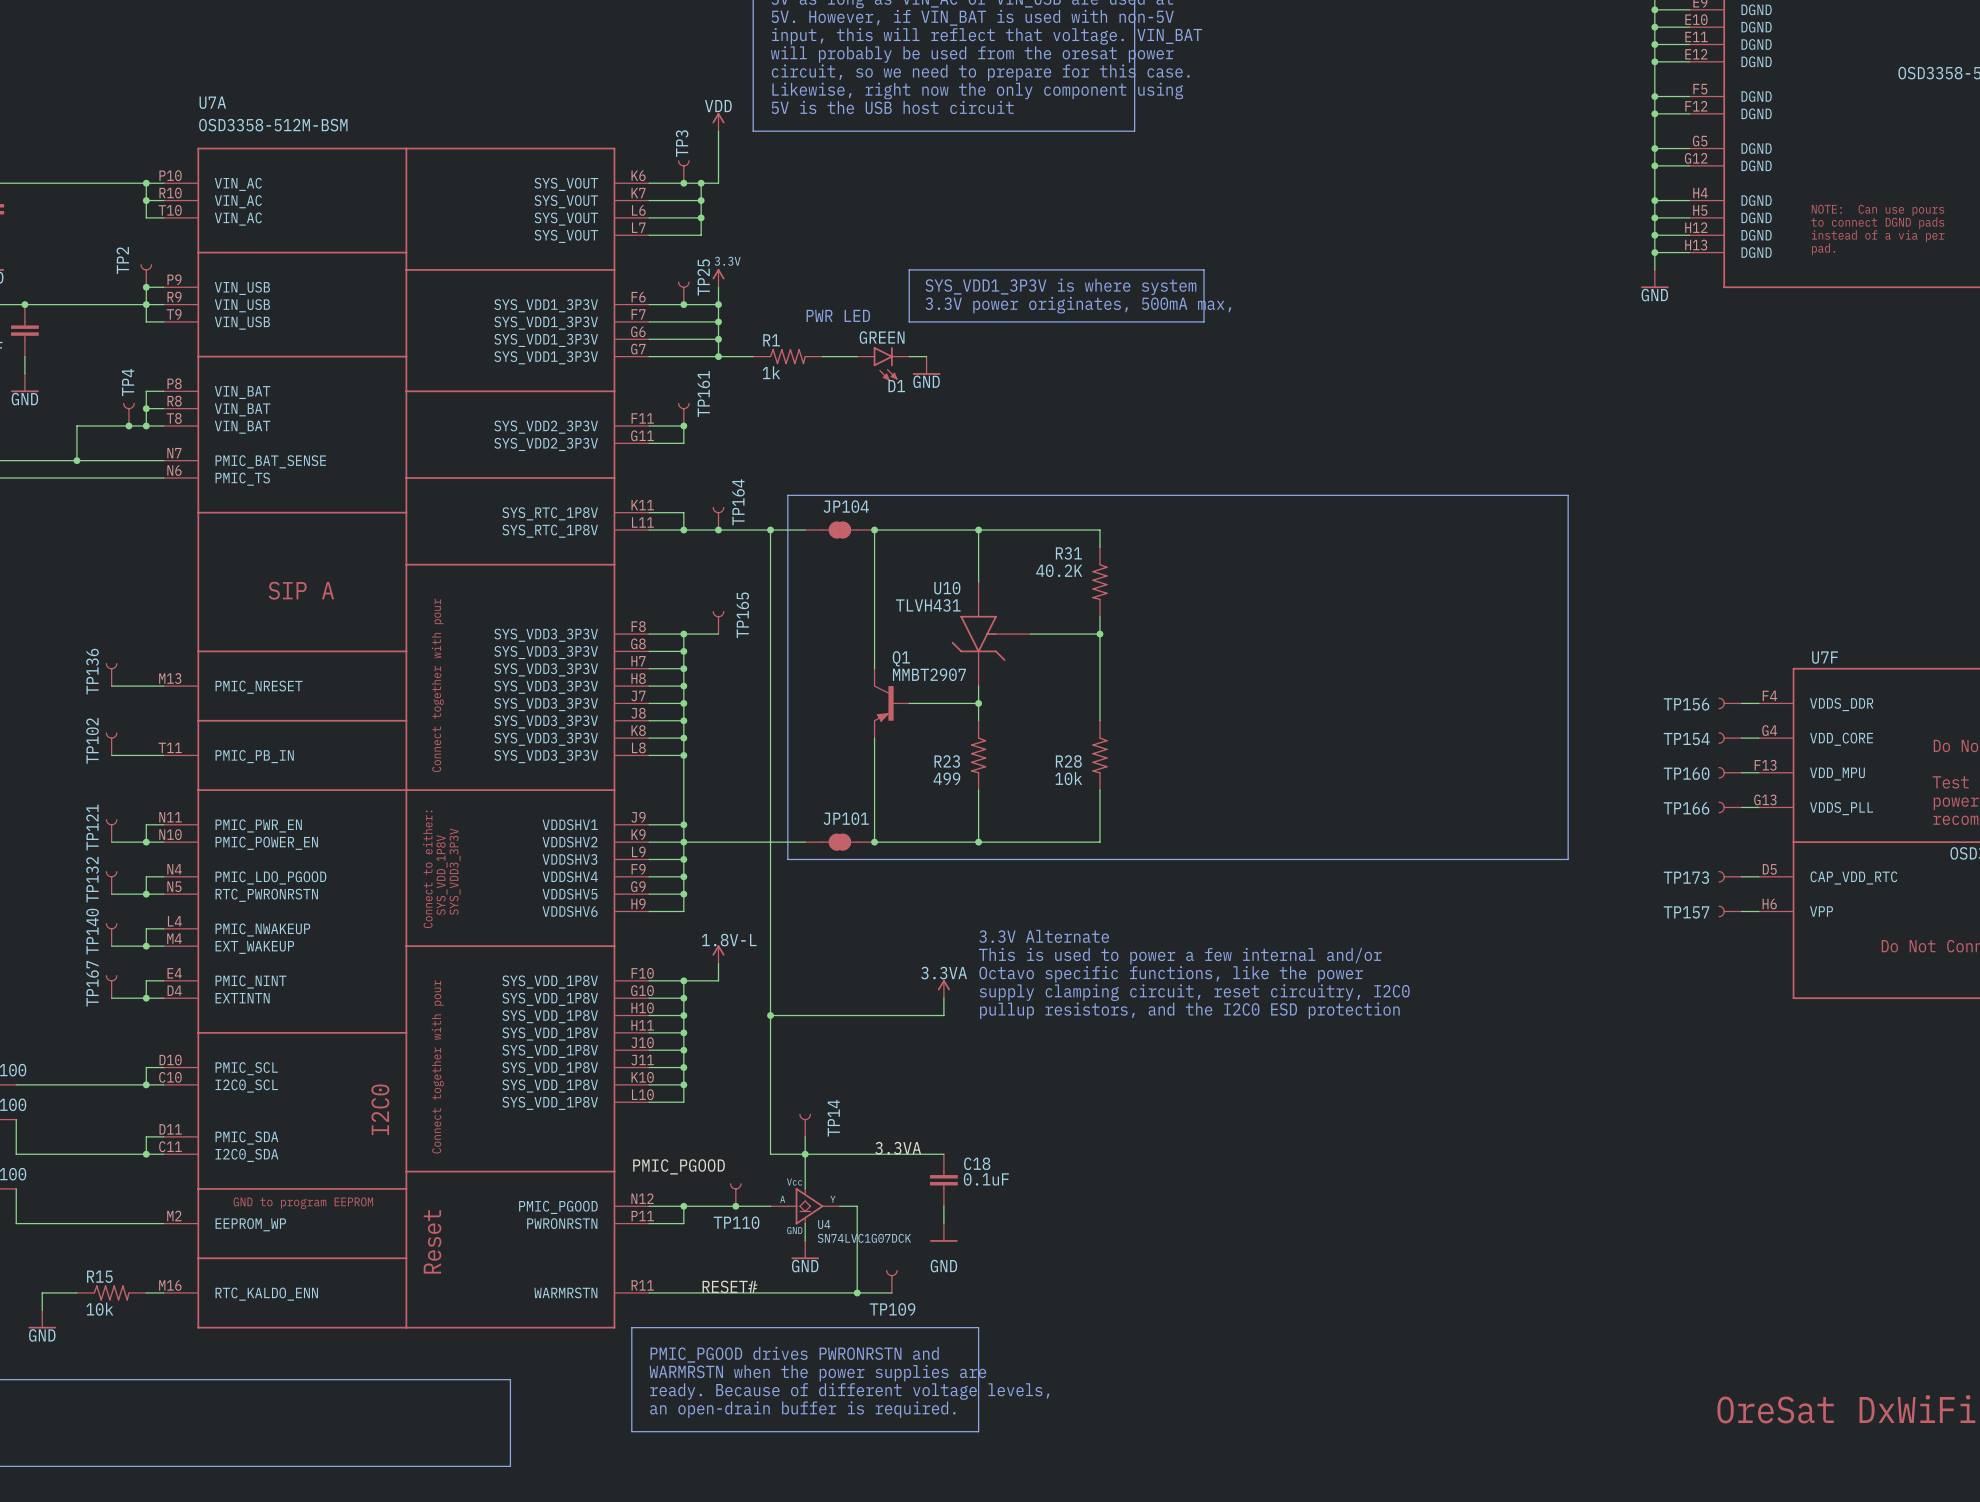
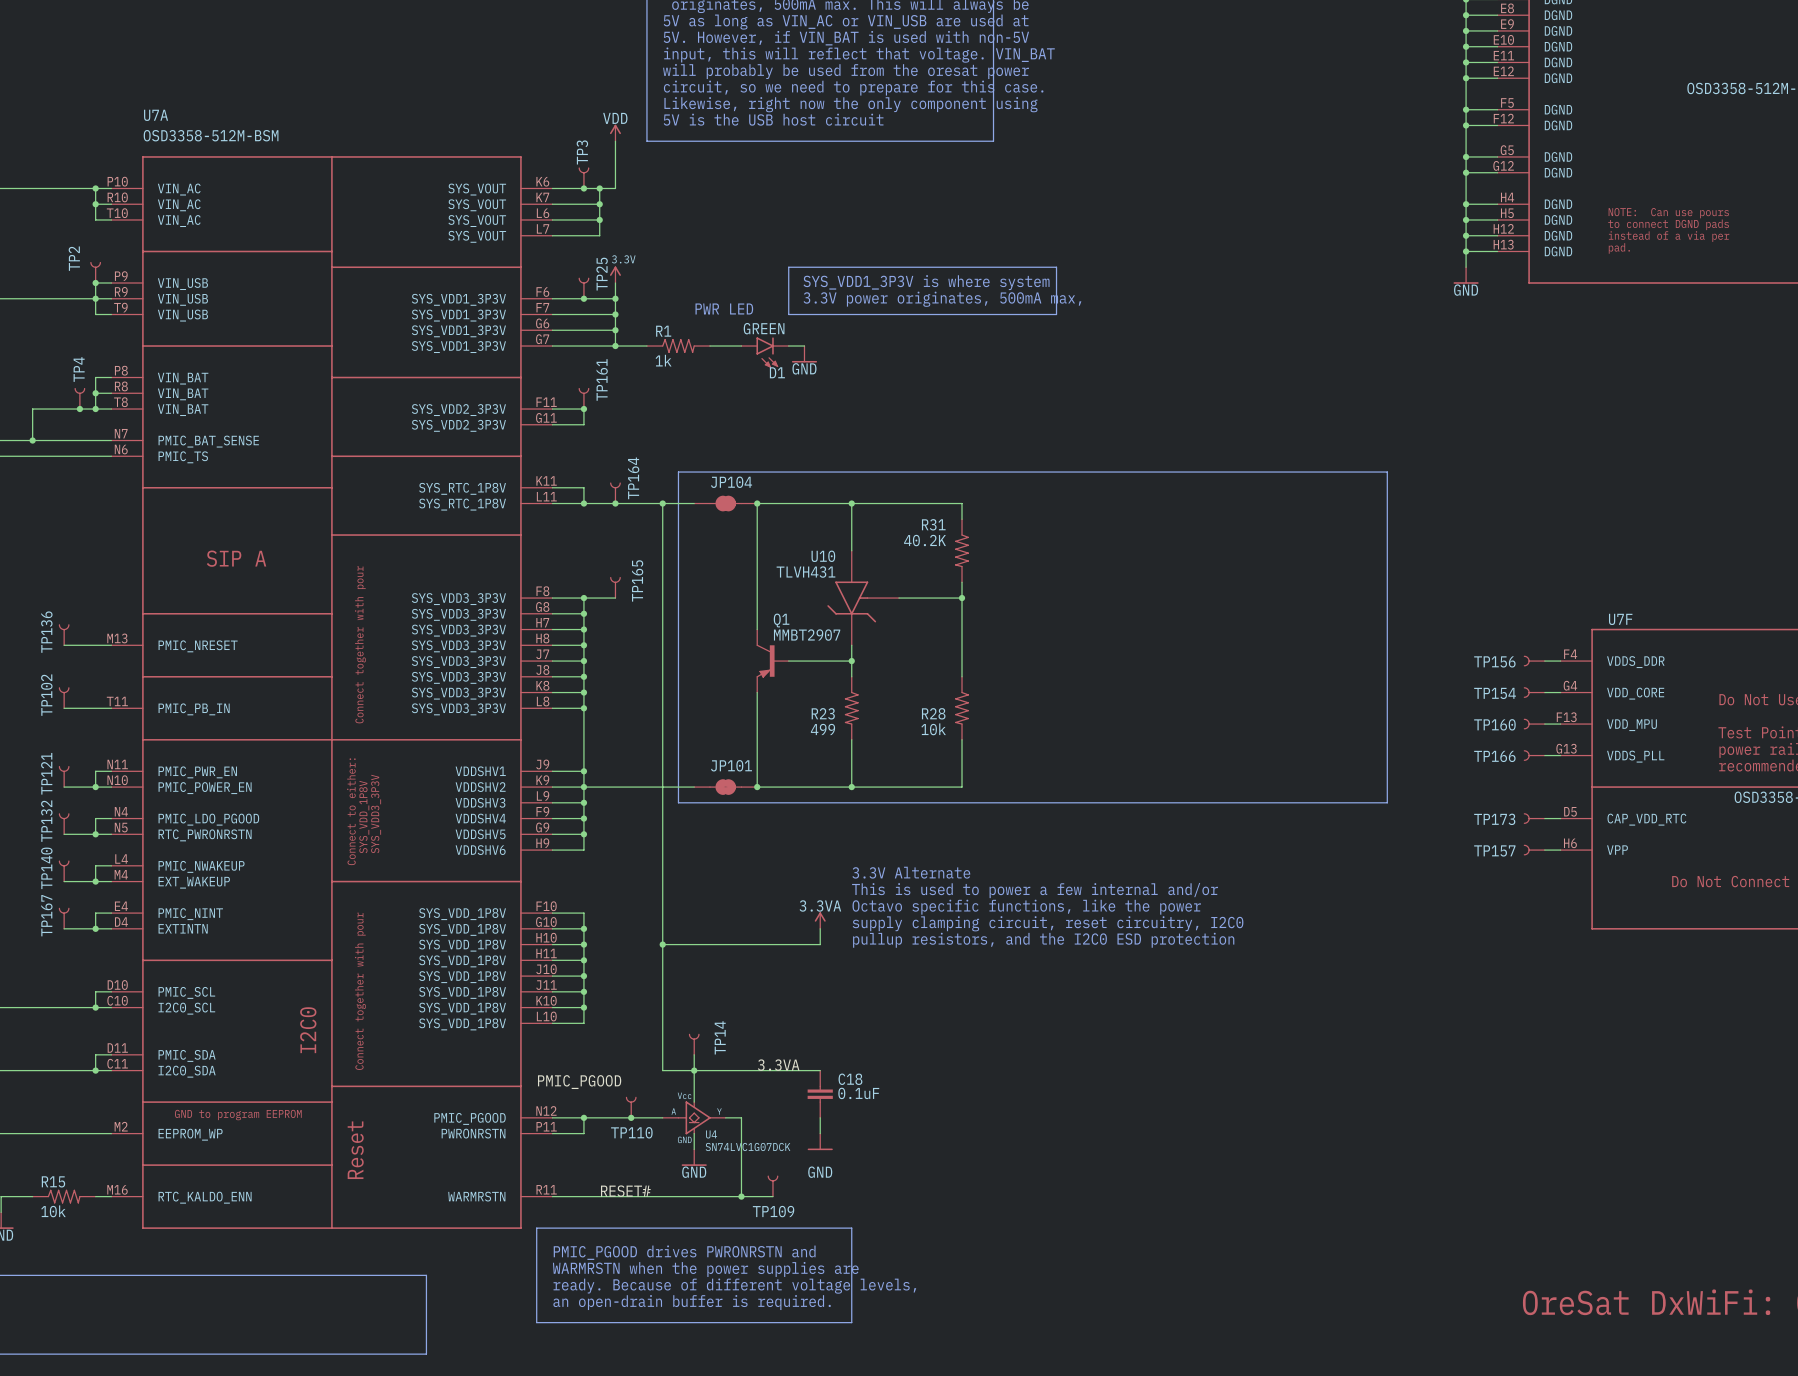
power symbol: 1.8V-L (718, 954) -> none
wire: (718, 963) (718, 980) (683, 980) -> none
junction: (683, 980) -> none

